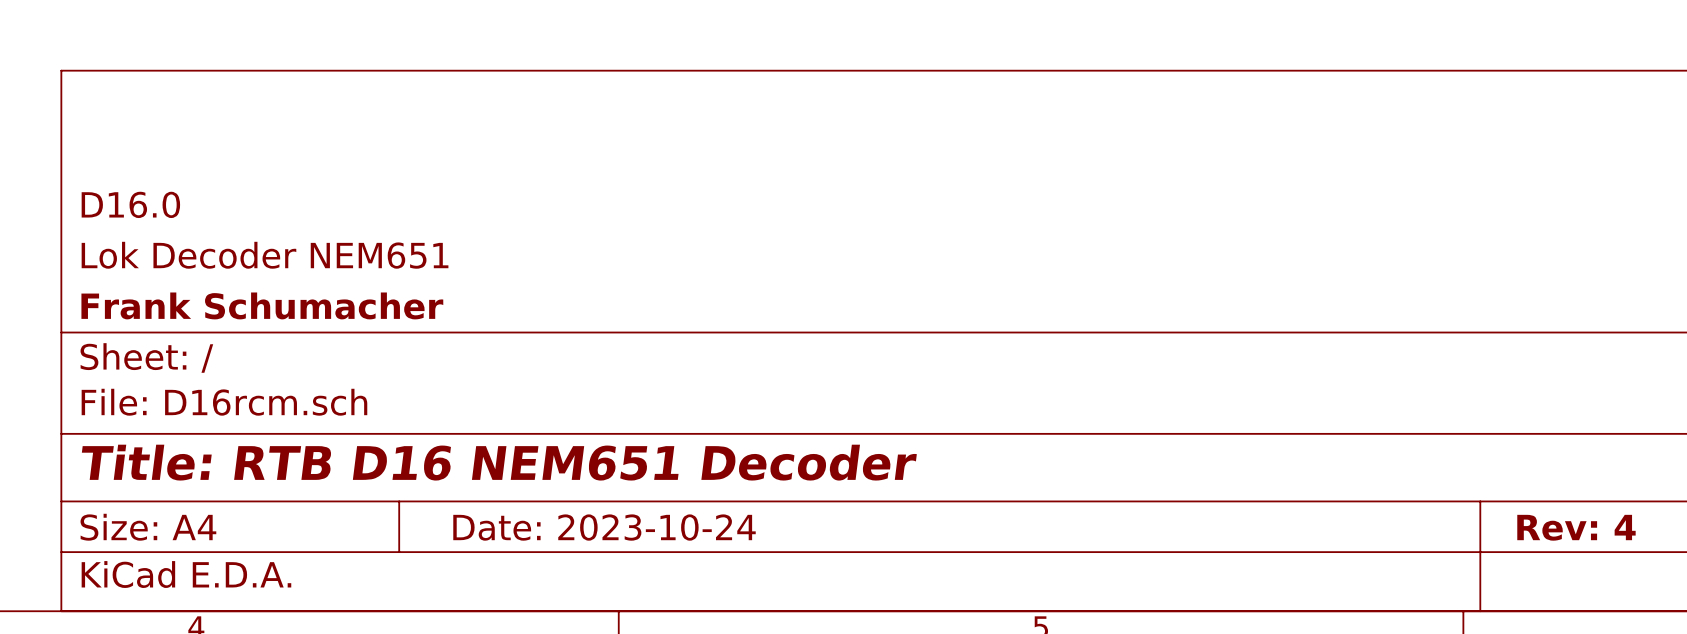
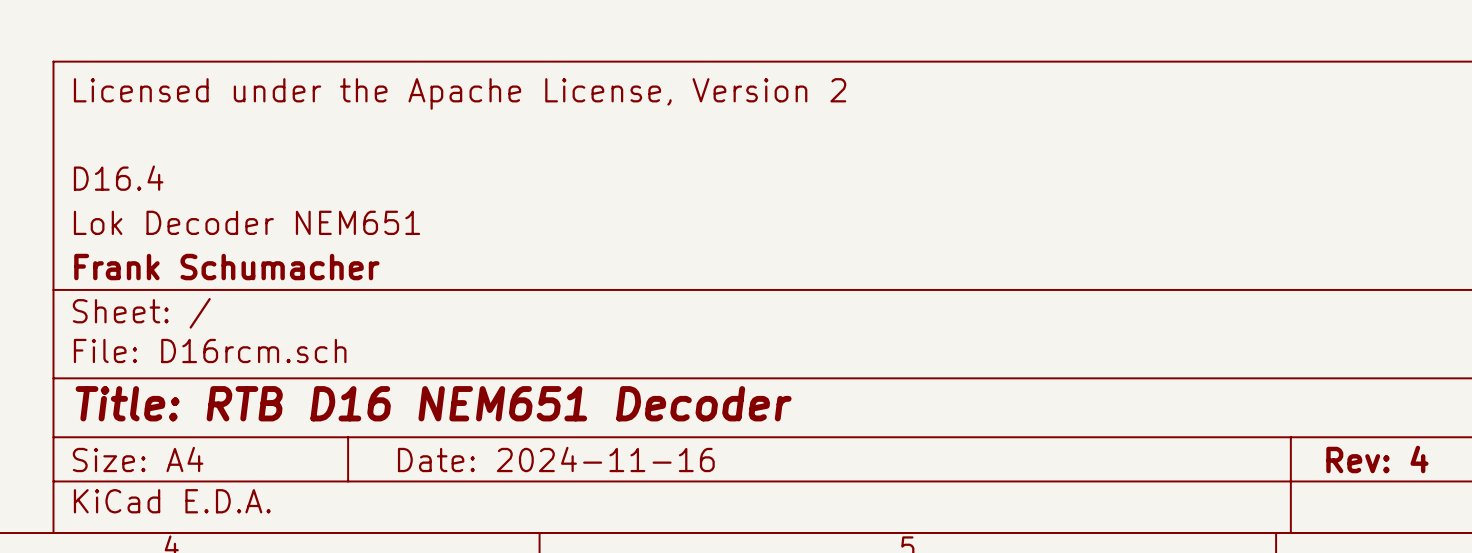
title block: none -> Licensed under the Apache License, Version 2 (460, 93)
title block: D16.0 (130, 204) -> D16.4 (118, 178)
title block: Date: 2023-10-24 (604, 527) -> Date: 2024-11-16 (556, 459)

